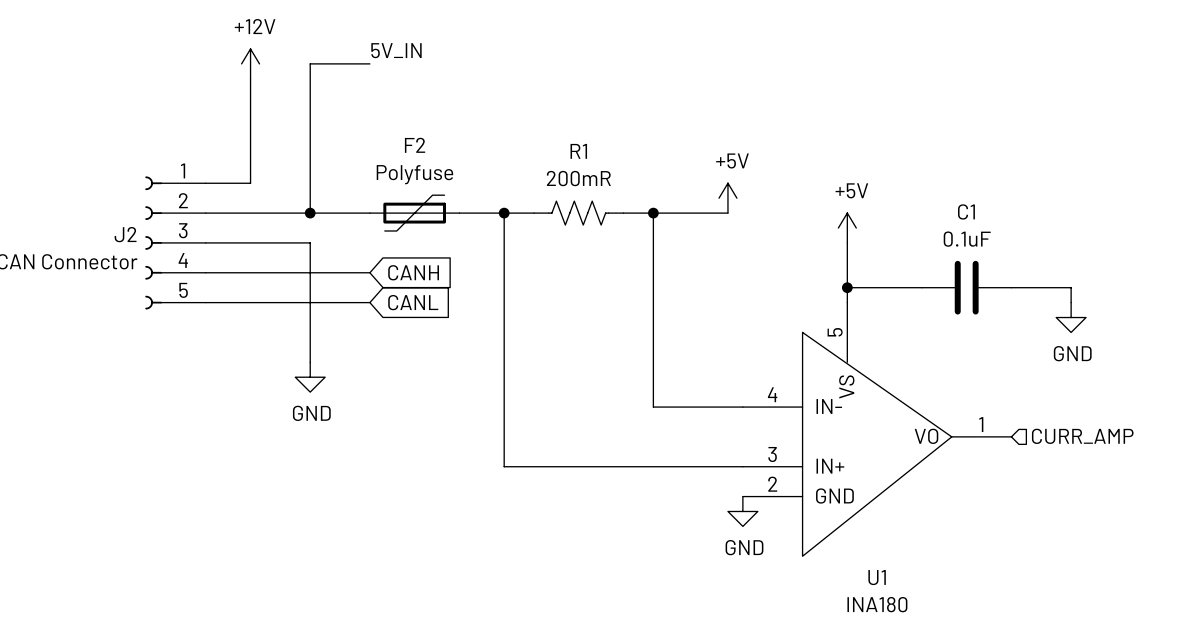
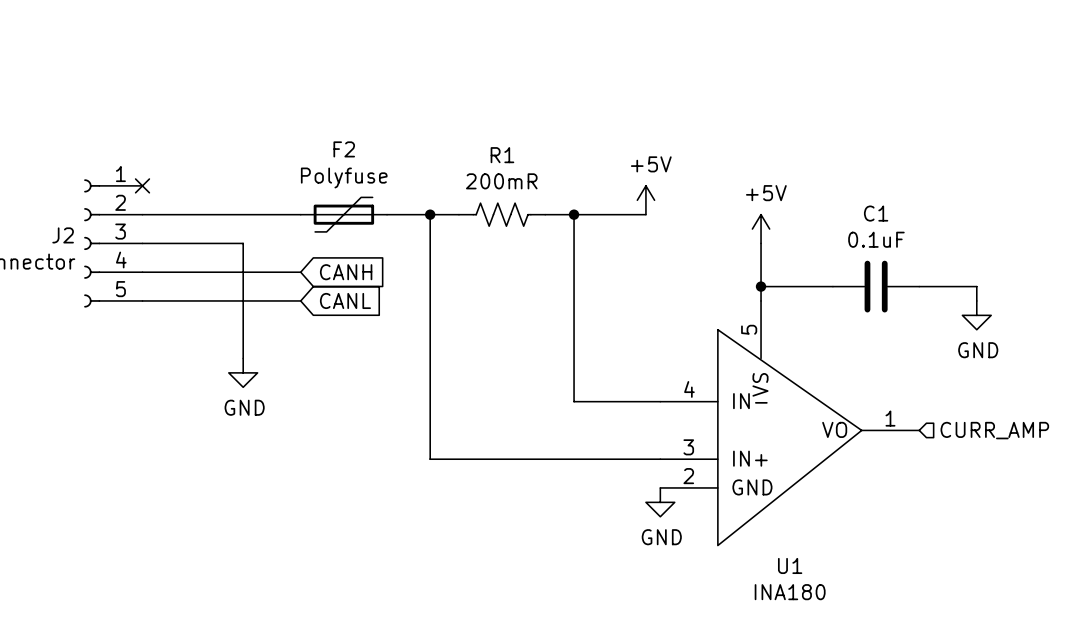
label: 5V_IN (396, 50) -> none
power symbol: +12V (250, 63) -> none
wire: (369, 63) (310, 63) (310, 213) -> none
wire: (250, 78) (250, 183) (205, 183) -> none
no-connect mark: none -> (142, 185)
junction: (310, 213) -> none

